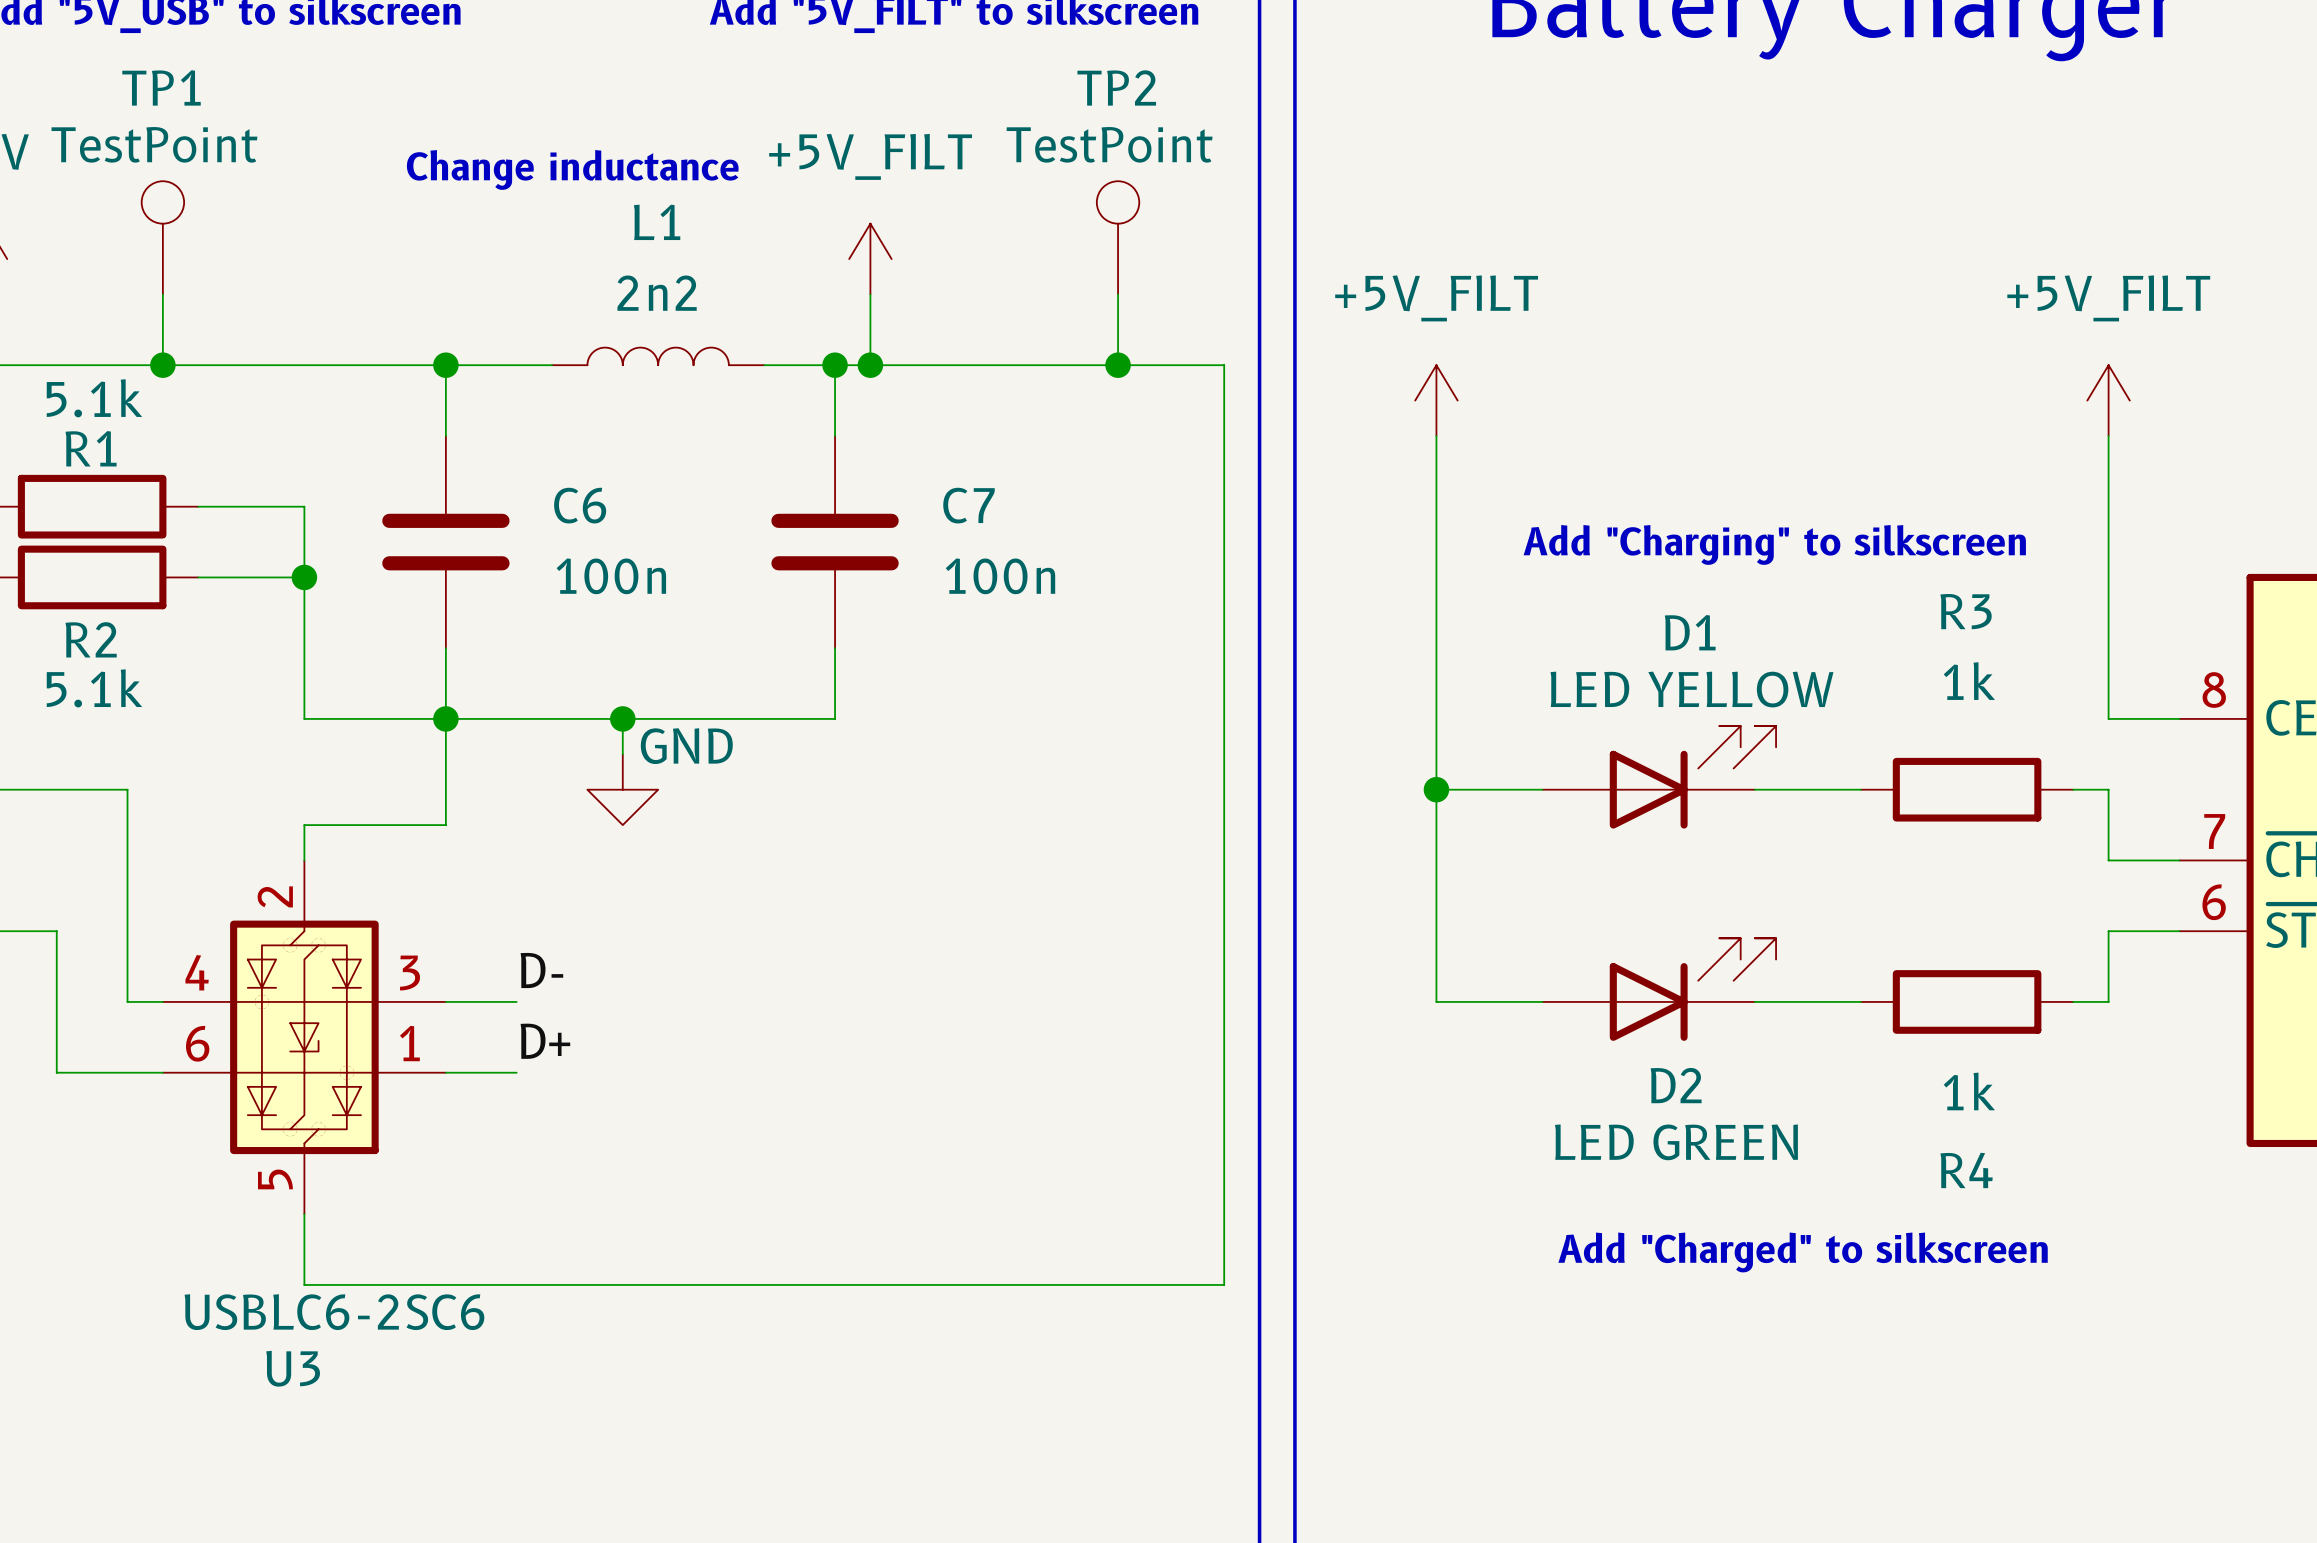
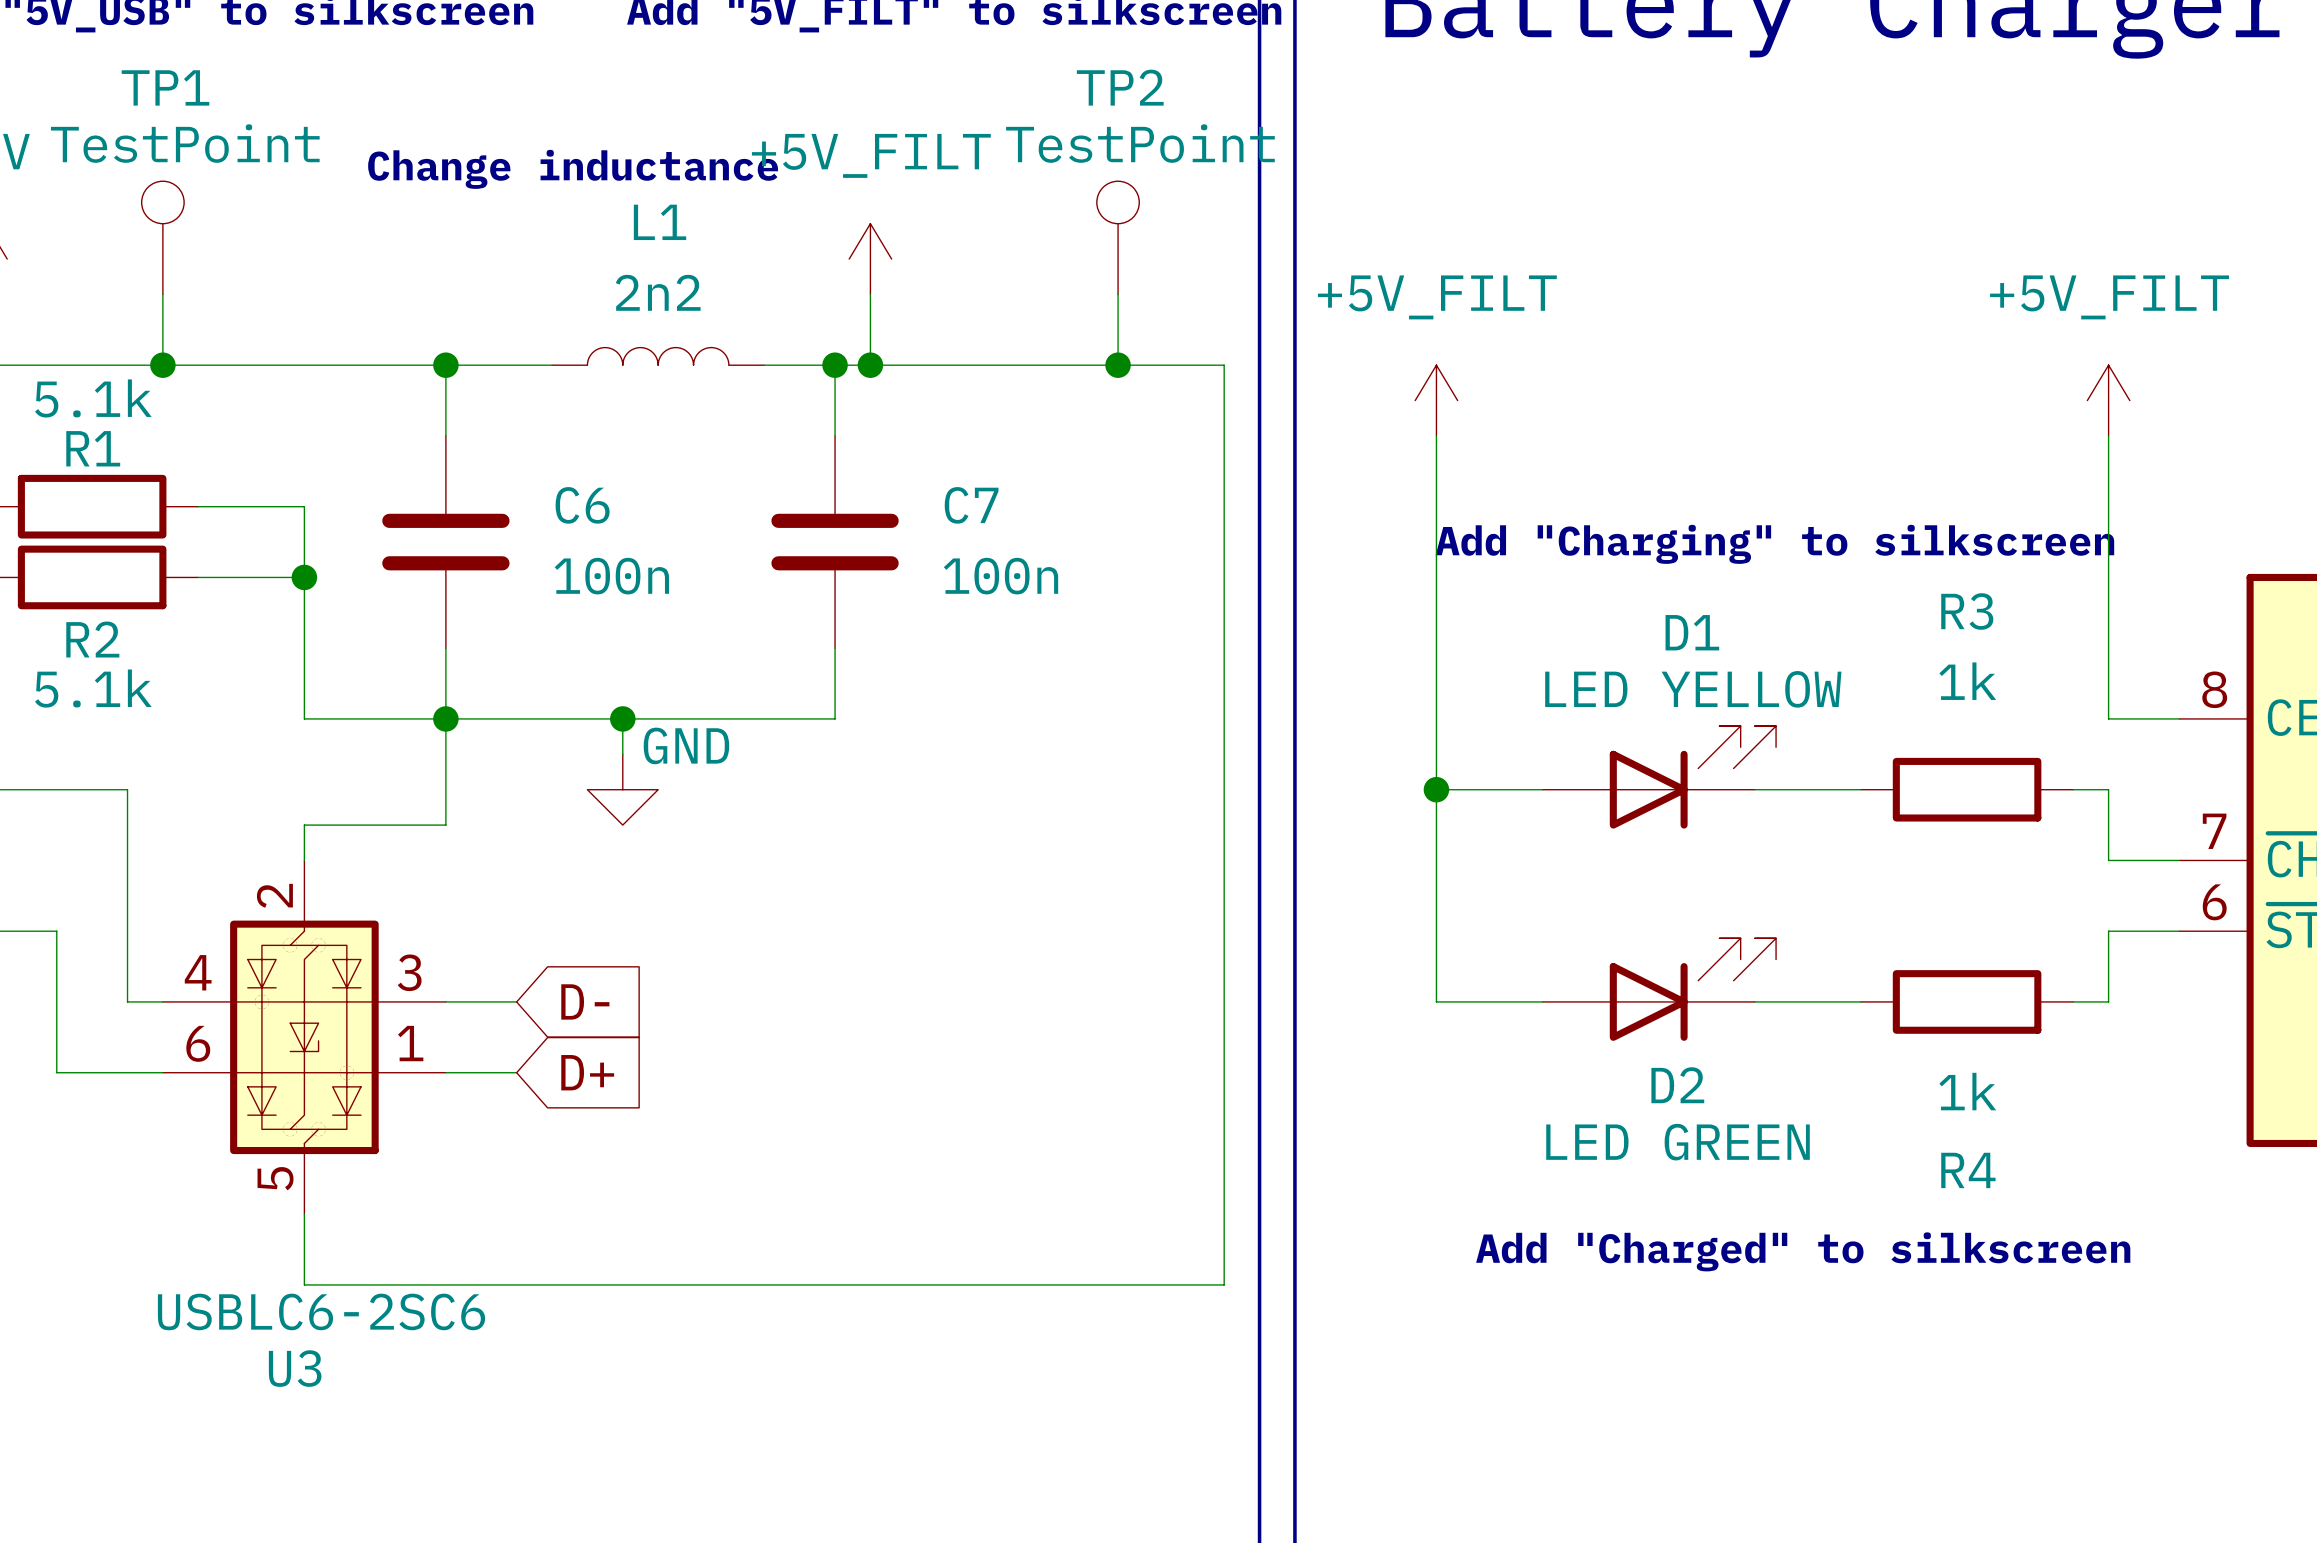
label: D- (541, 970) -> none
global label: none -> D- (585, 1001)
label: D+ (545, 1041) -> none
global label: none -> D+ (587, 1072)

